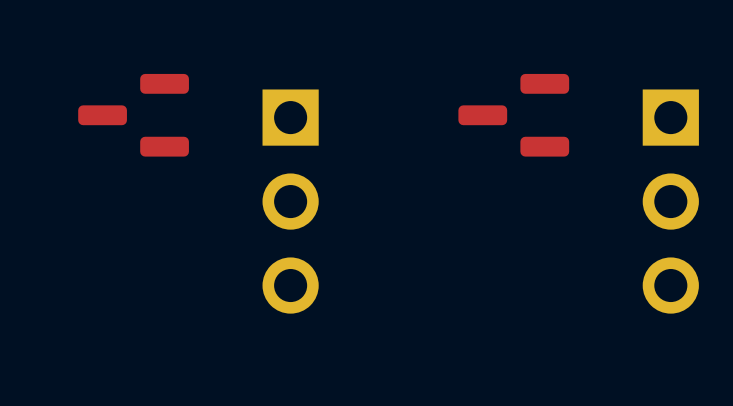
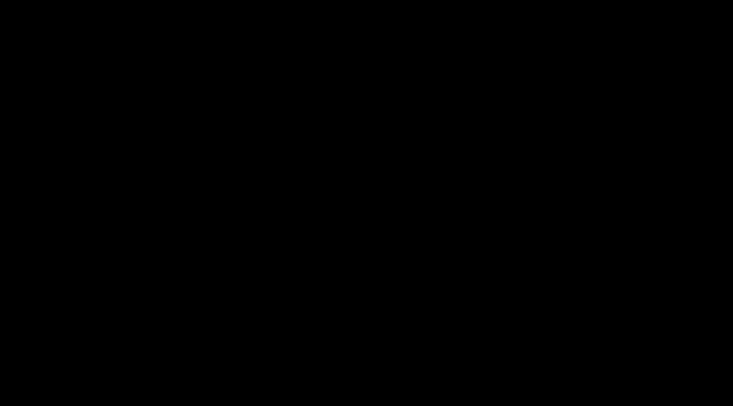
part: (133, 115) -> none
part: (513, 115) -> none
part: (290, 201) -> none
part: (670, 201) -> none

